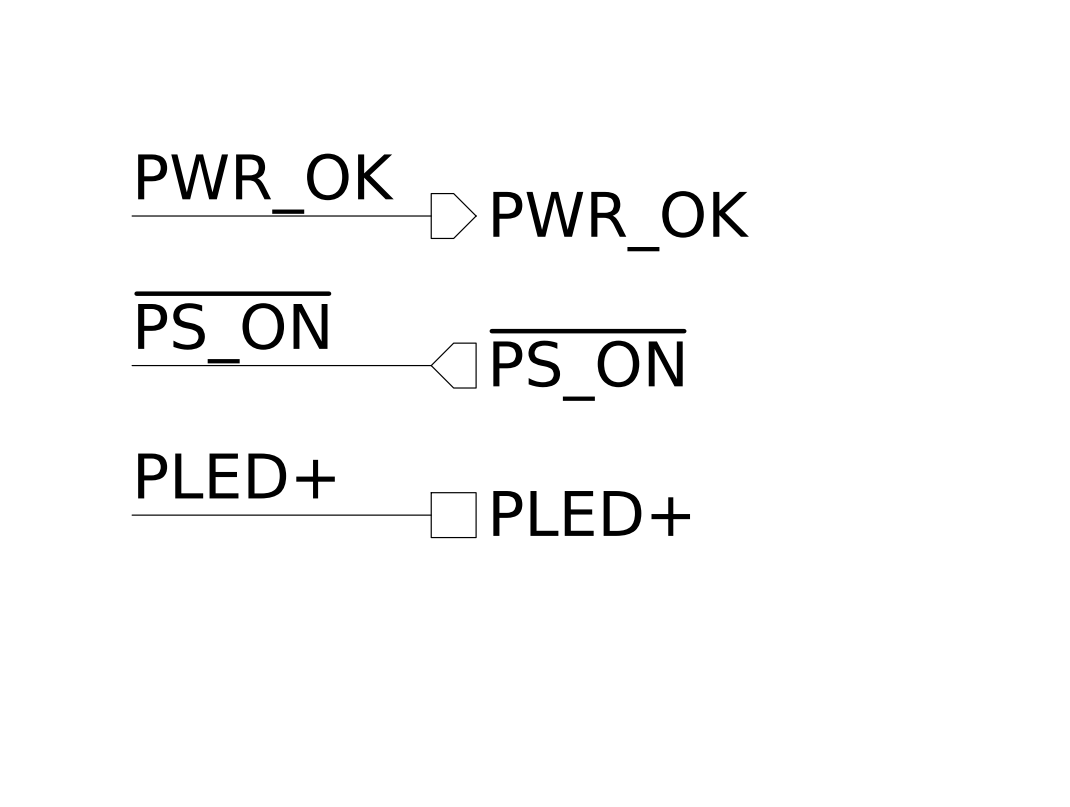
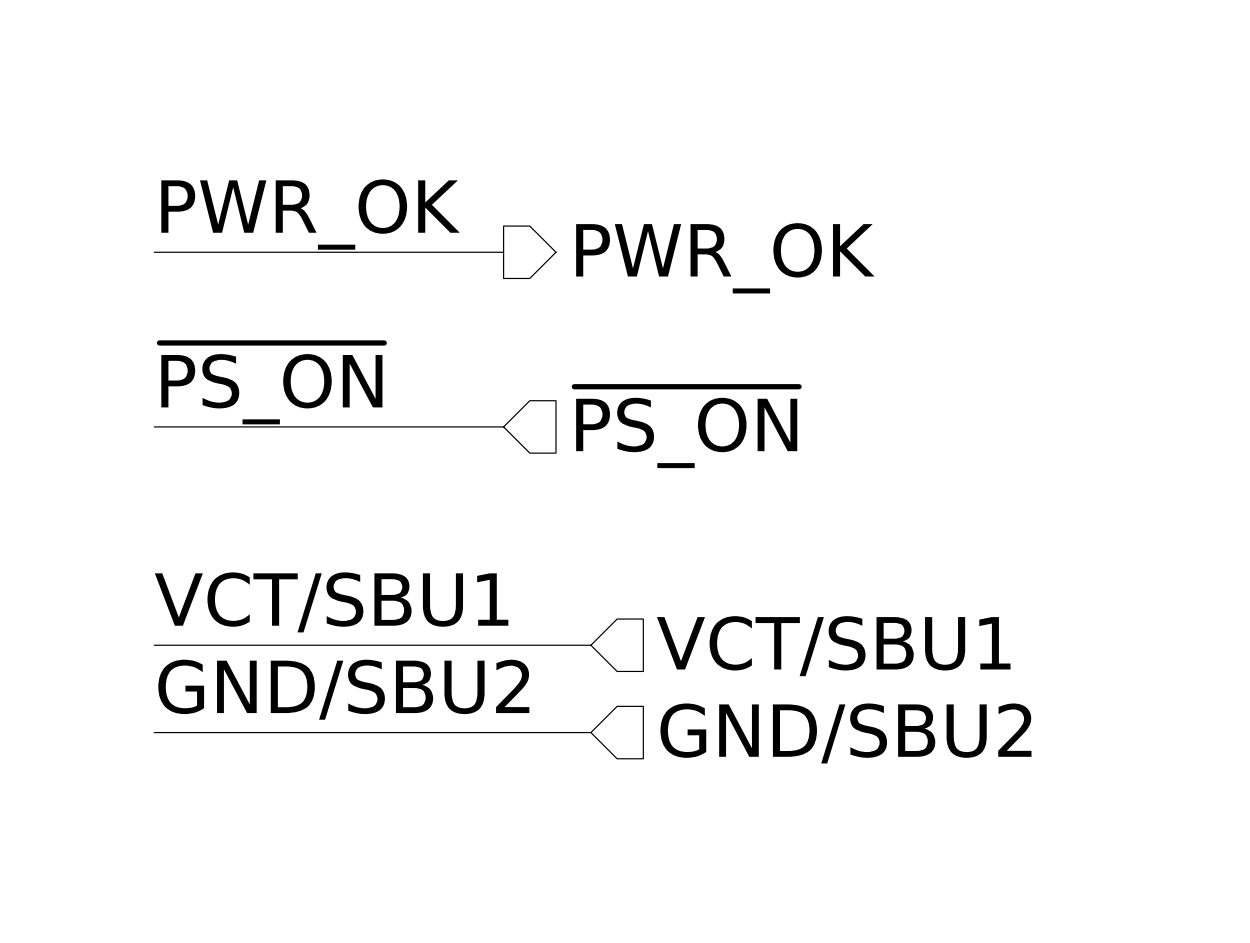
label: PLED+ (236, 475) -> none
hierarchical label: PLED+ (591, 513) -> none
wire: (132, 515) (431, 515) -> none
label: none -> VCT/SBU1 (331, 602)
wire: none -> (154, 645) (590, 645)
hierarchical label: none -> VCT/SBU1 (833, 646)
label: none -> GND/SBU2 (343, 689)
wire: none -> (154, 732) (590, 732)
hierarchical label: none -> GND/SBU2 (845, 733)

